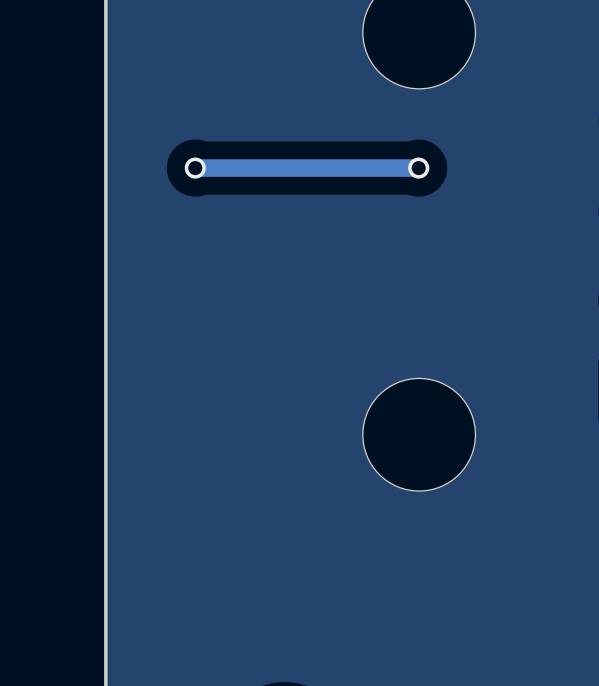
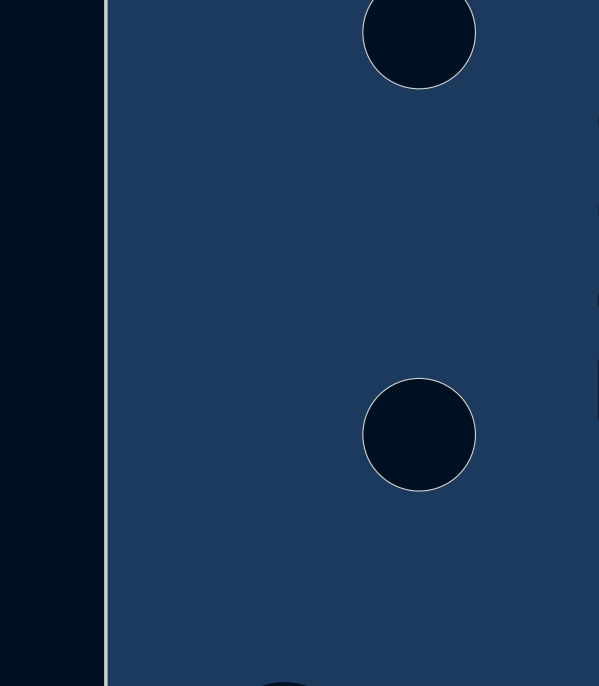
via: (195, 168) -> none
track: (418, 168) (195, 168) -> none
via: (418, 168) -> none

